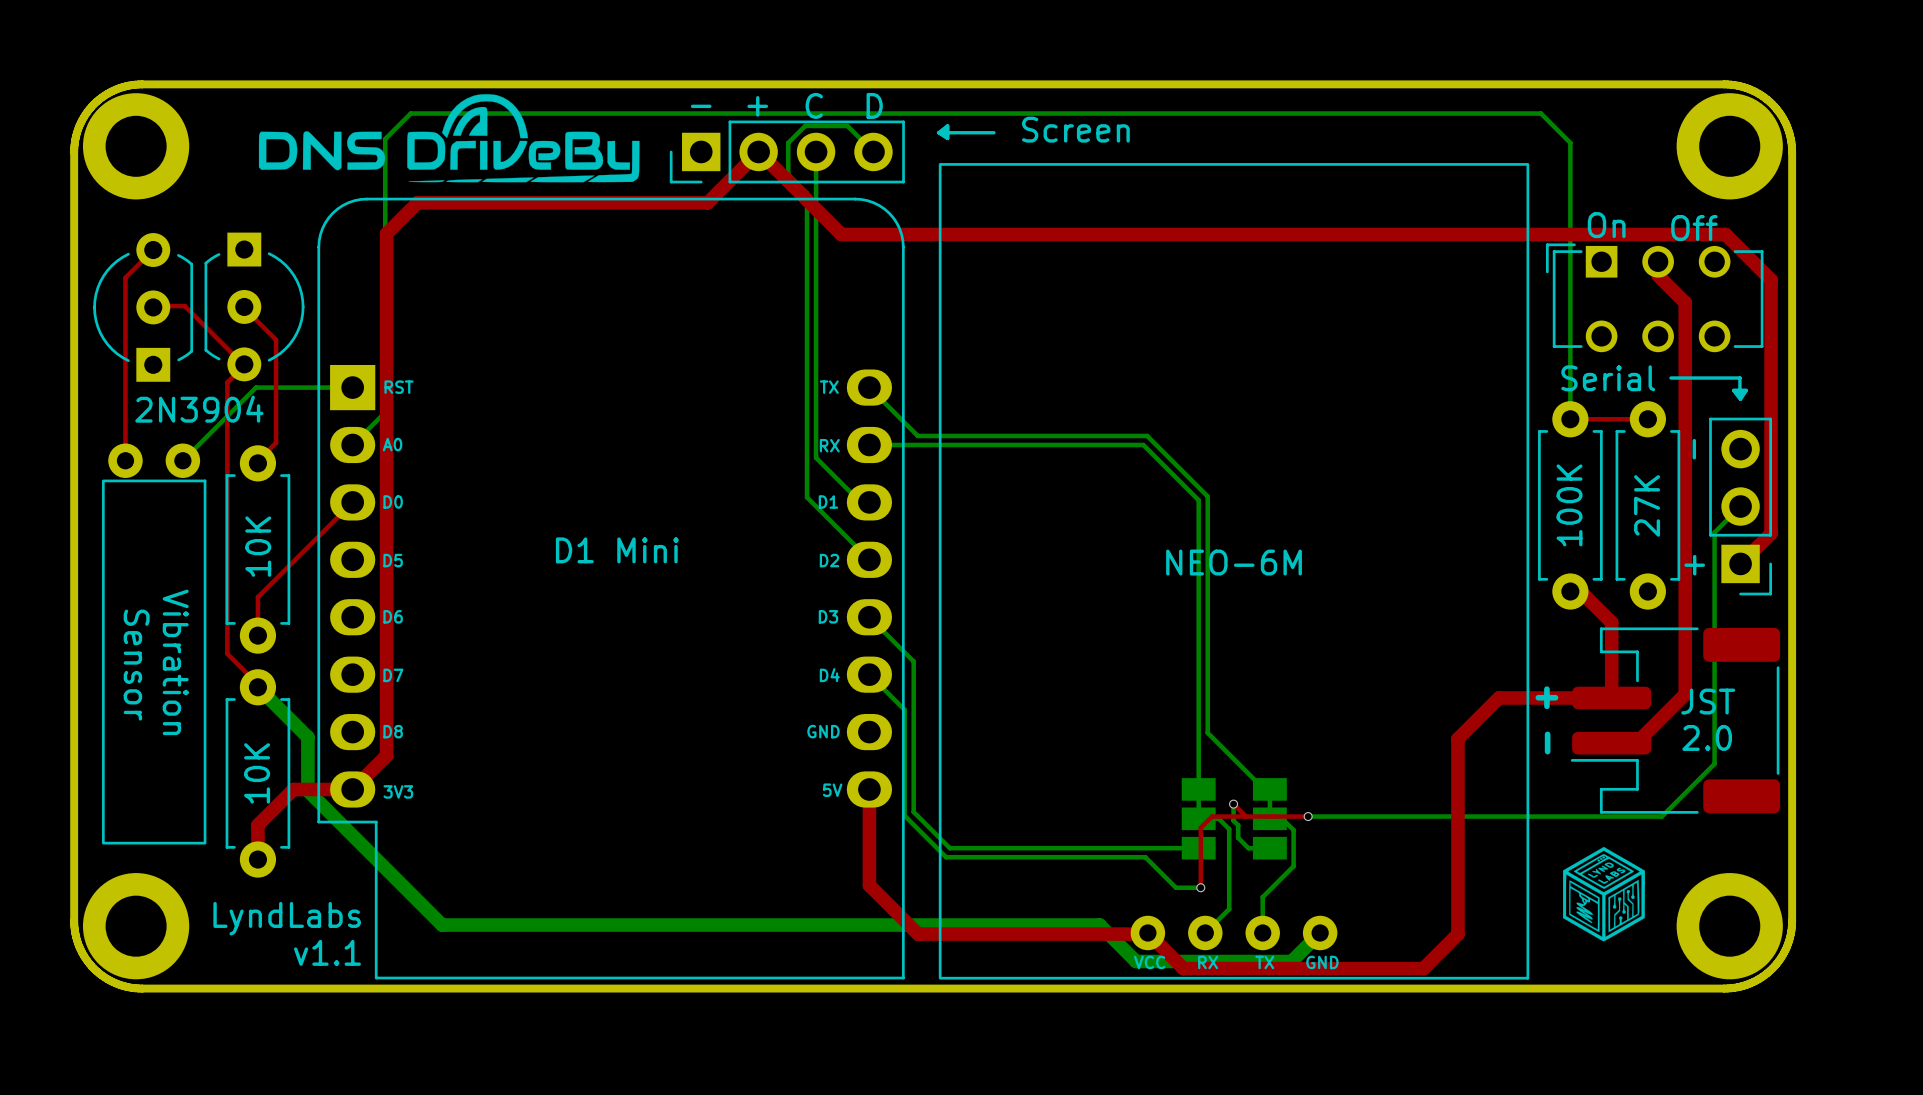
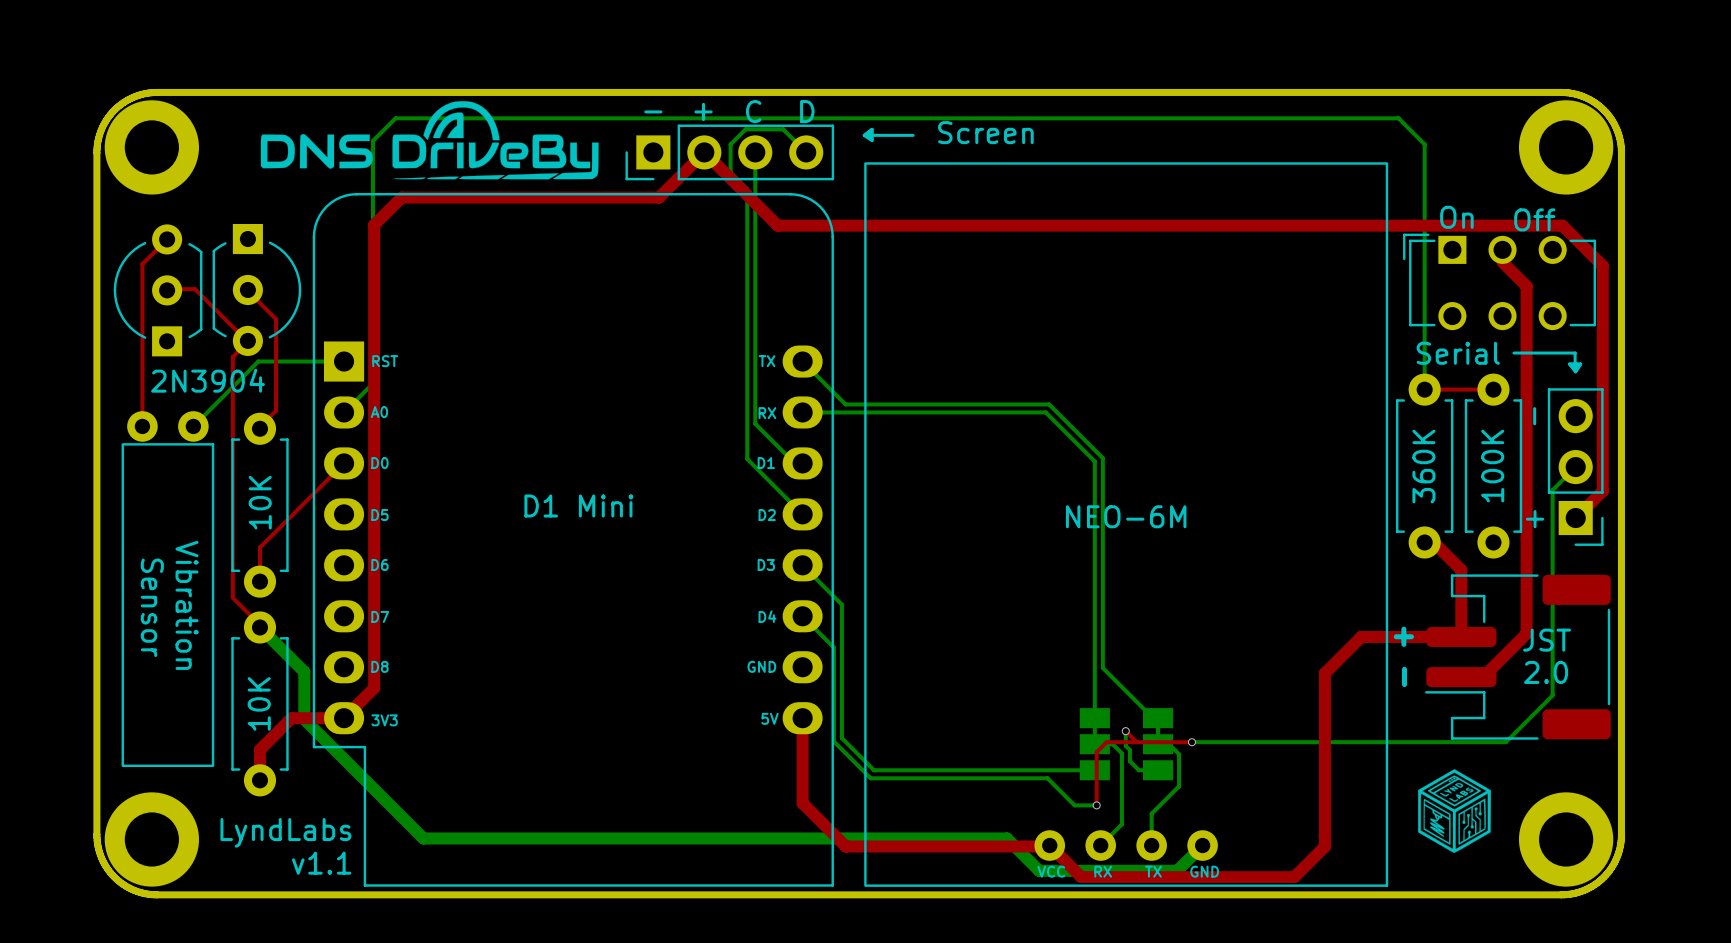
part value: 100K (1569, 505) -> 360K (1423, 466)
part value: 27K (1647, 505) -> 100K (1492, 466)

